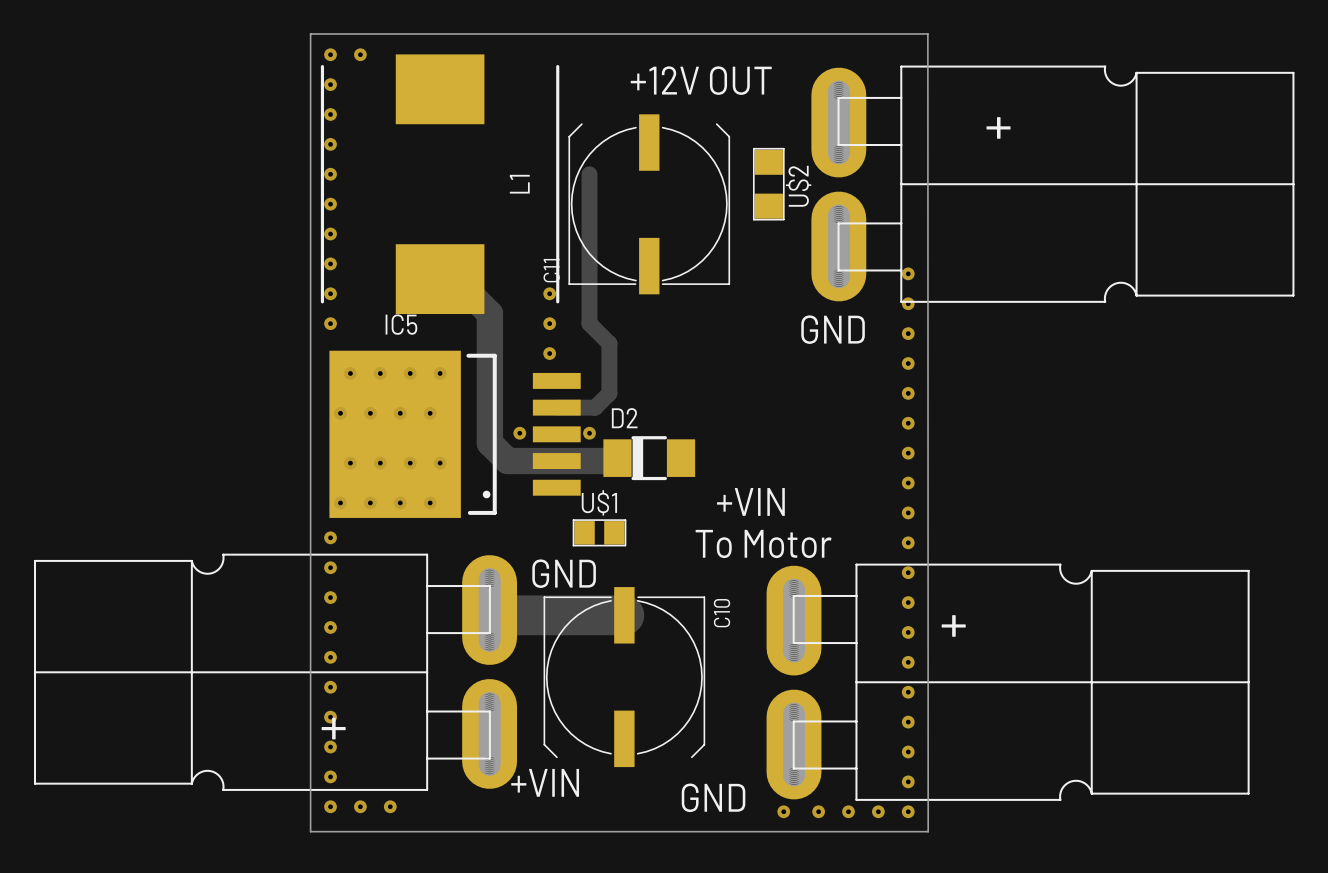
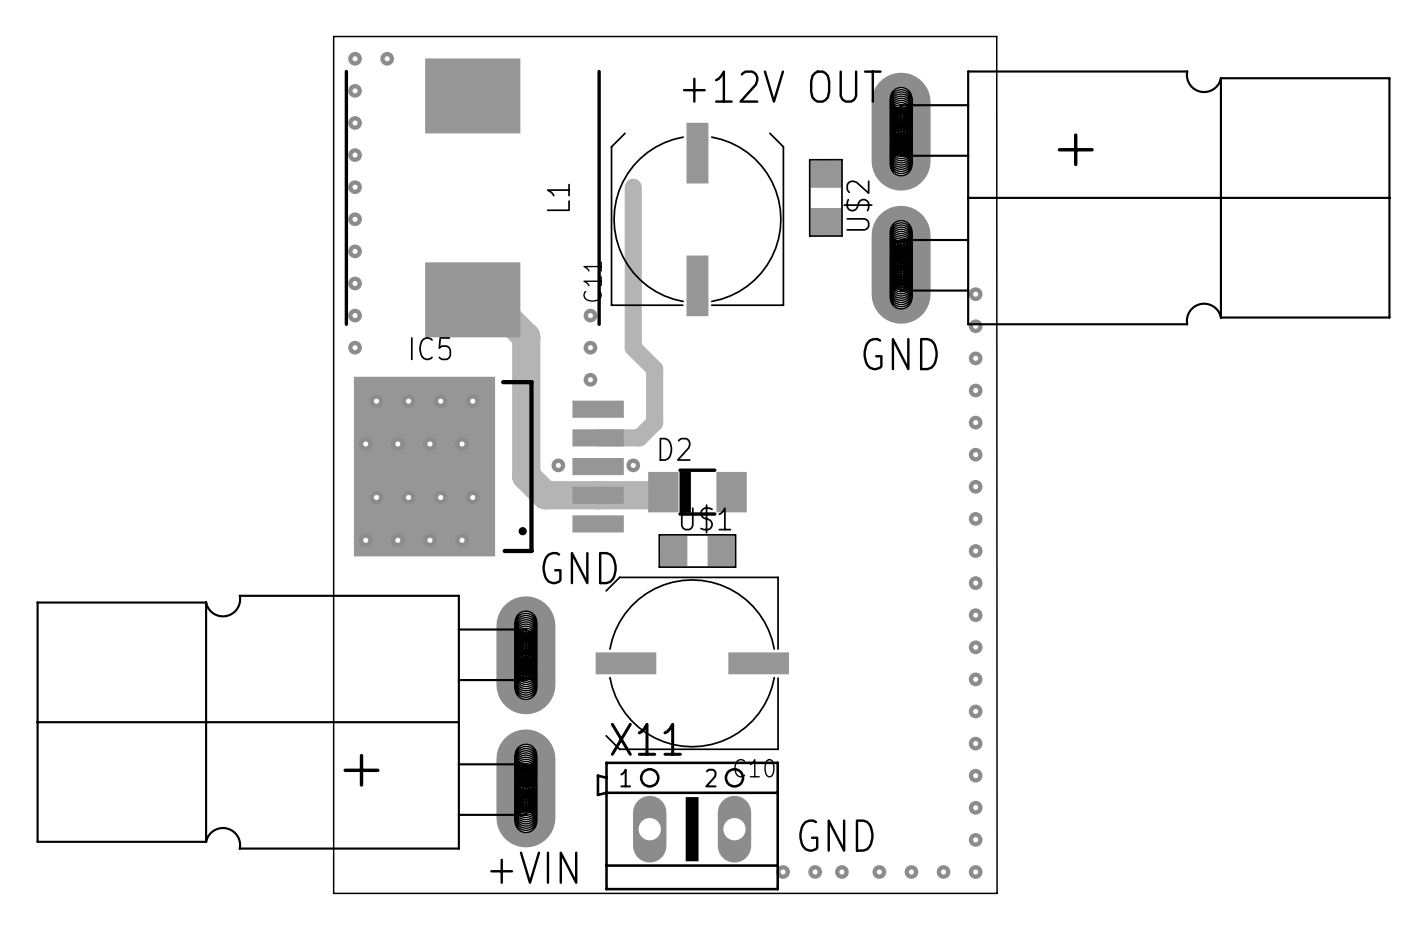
text: +VIN (750, 501) -> none
U$1 footprint: [572, 519, 627, 547] -> [658, 534, 737, 568]
via: (330, 537) -> none
text: To Motor (763, 543) -> none
via: (330, 567) -> none
text position: GND (564, 573) -> GND (579, 568)
via: (330, 597) -> none
track: (489, 610) (489, 615) (624, 615) -> none
via: (330, 627) -> none
via: (330, 657) -> none
C10 rotation: 0° (624, 677) -> 90° clockwise (692, 663)
part: (1008, 682) -> none
via: (330, 687) -> none
via: (330, 717) -> none
via: (330, 747) -> none
X11: none -> (687, 825)
via: (330, 776) -> none
text position: +VIN (545, 782) -> +VIN (533, 867)
text position: GND (713, 797) -> GND (836, 835)
via: (330, 806) -> none
via: (360, 806) -> none
via: (390, 806) -> none
via: none -> (783, 871)
via: none -> (815, 871)

